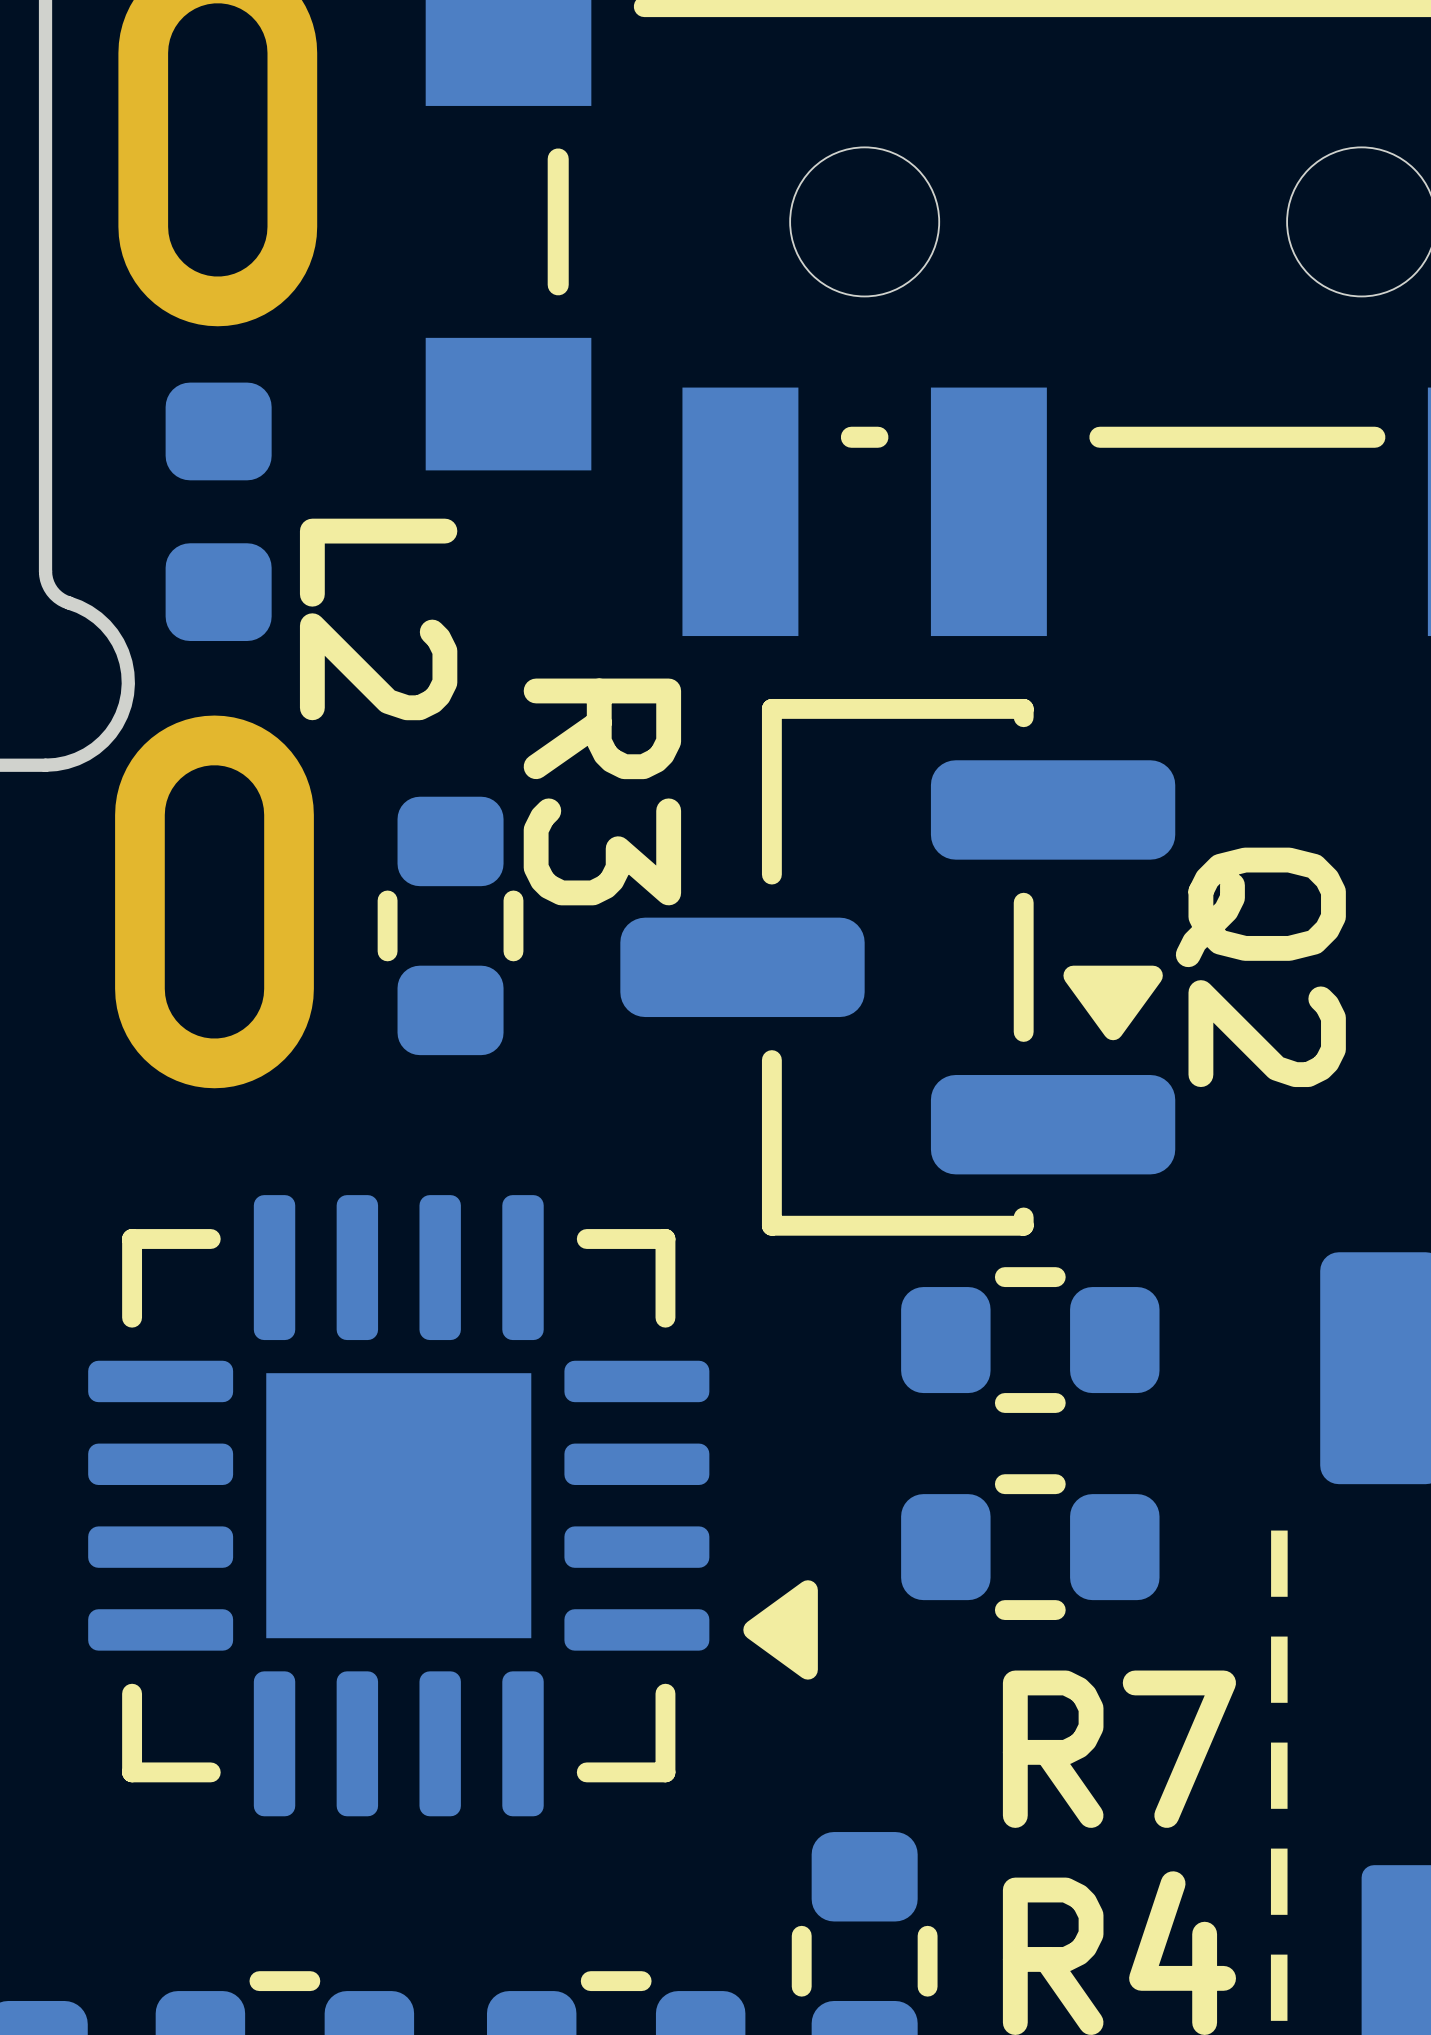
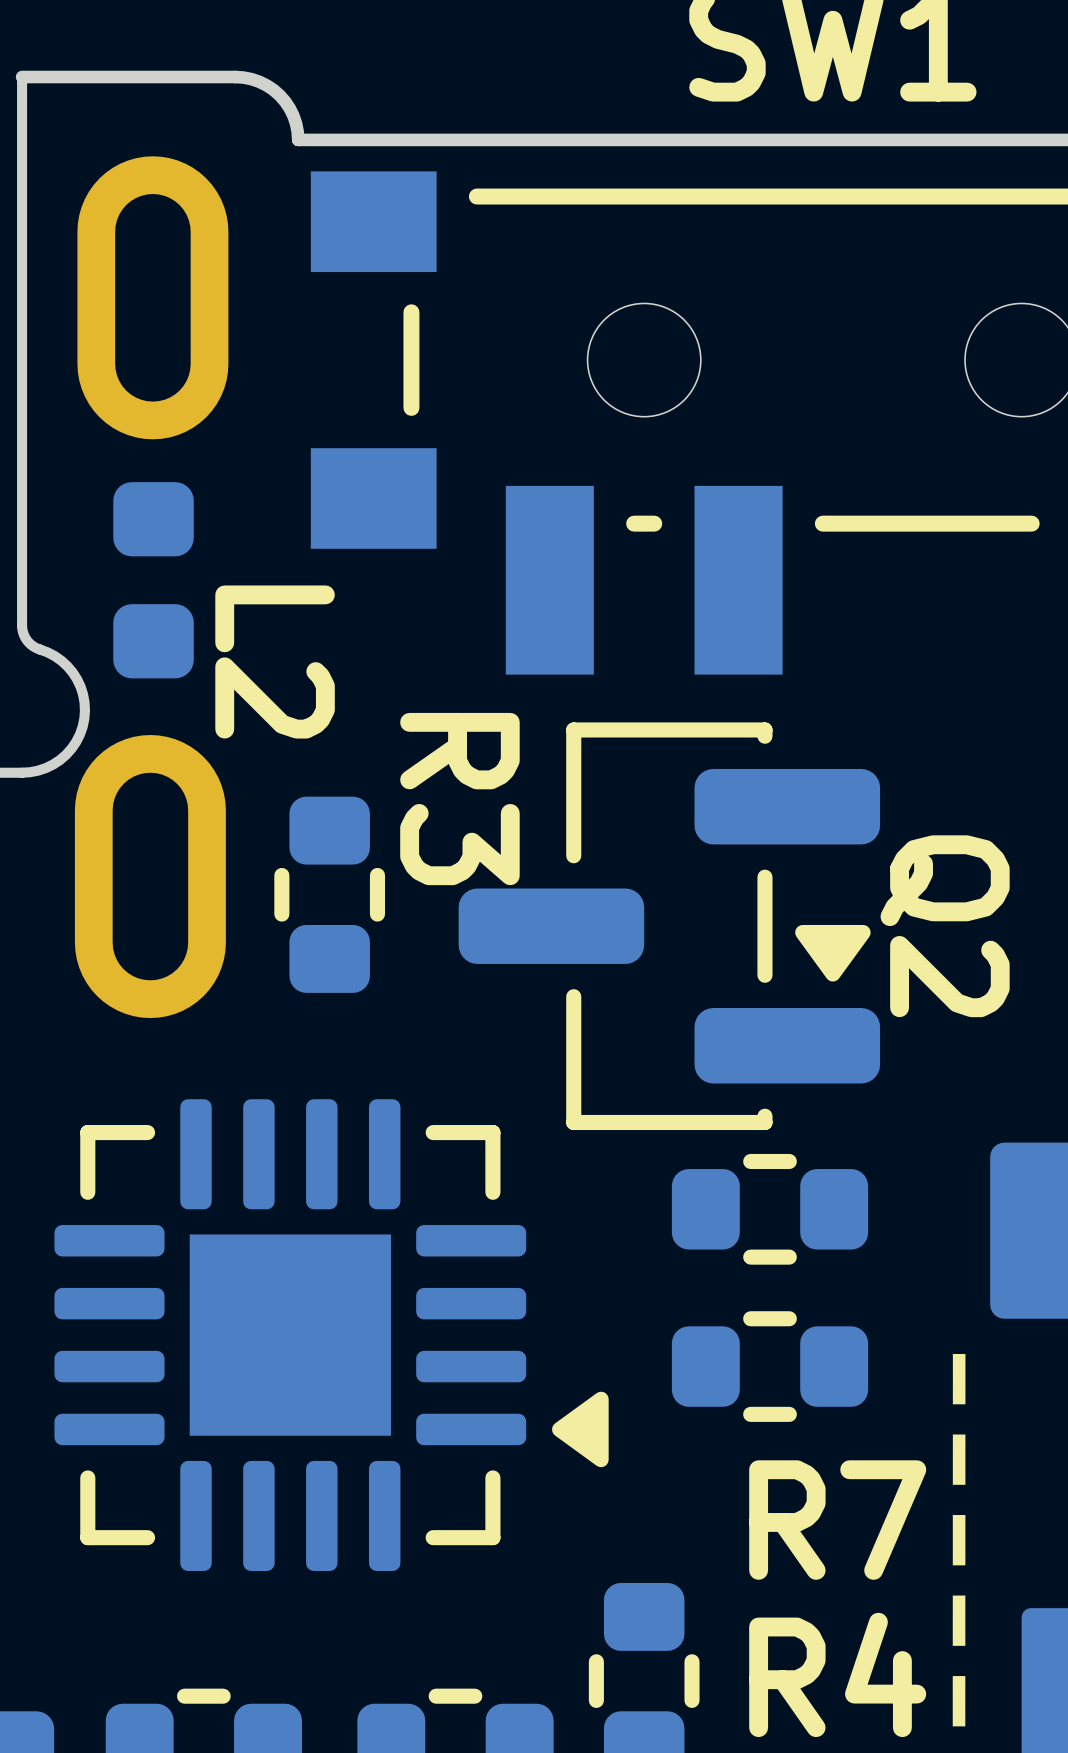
R3 name position: R3 (602, 791) -> R3 (459, 799)

